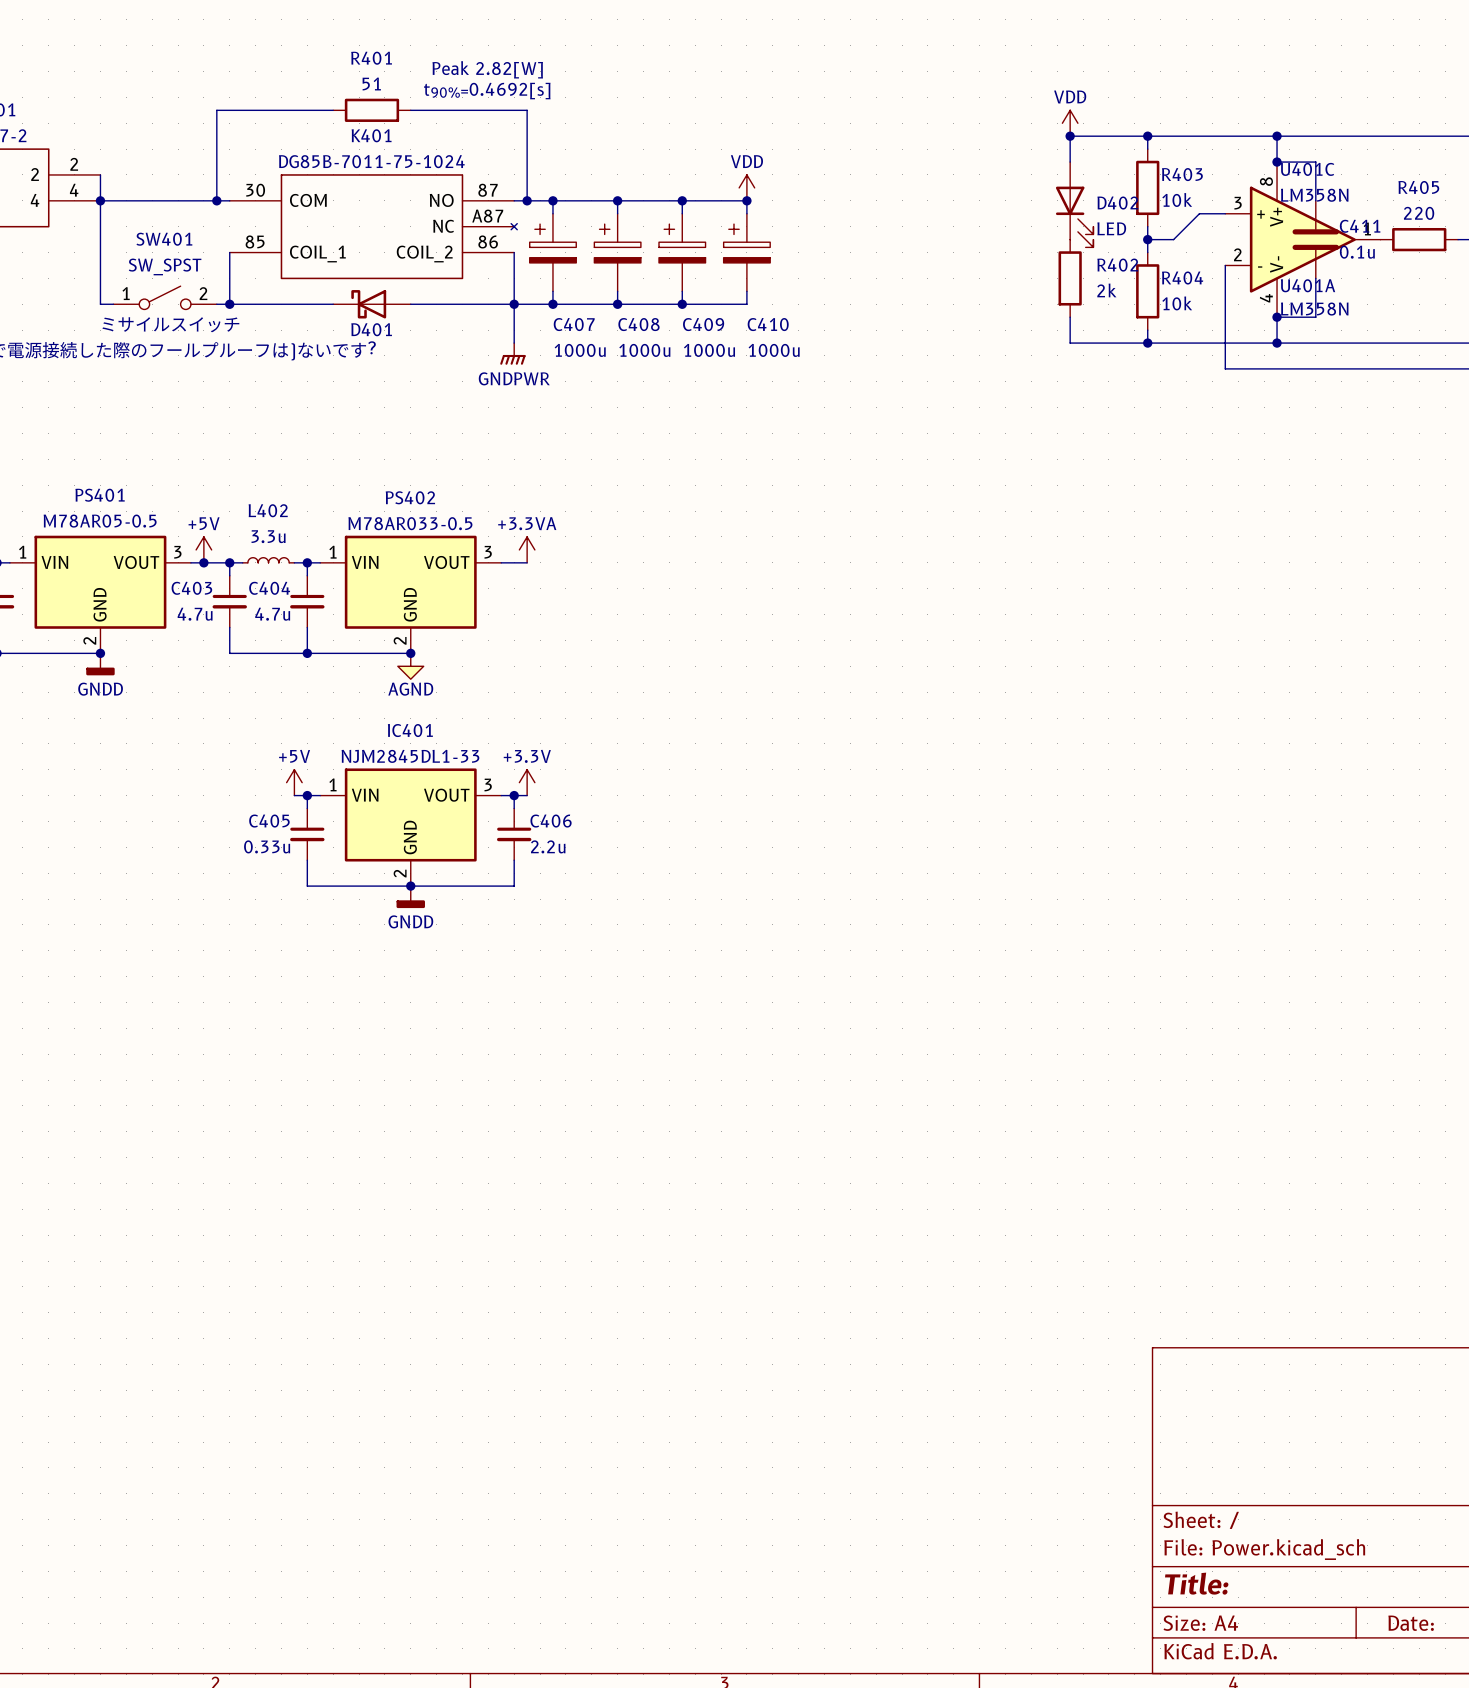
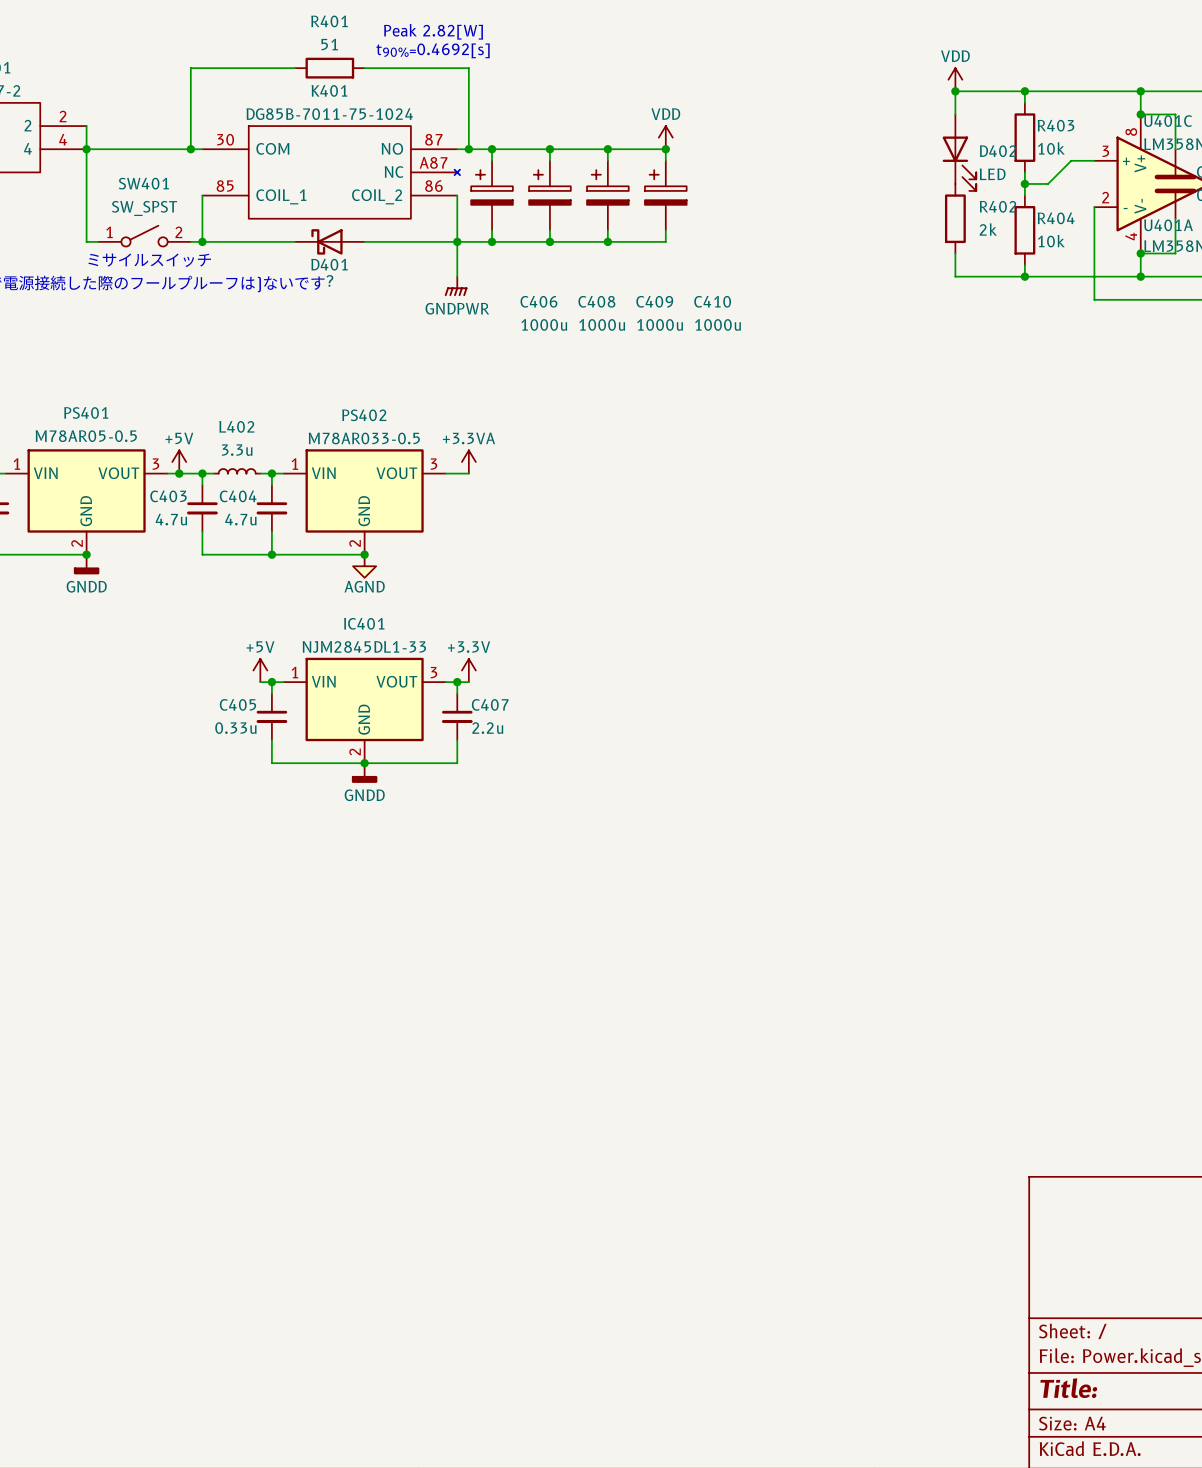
C407 name: C407 (574, 324) -> C406 (538, 301)
C408 name position: C408 (638, 324) -> C408 (596, 301)
C409 name position: C409 (703, 324) -> C409 (654, 301)
C410 name position: C410 (768, 324) -> C410 (712, 301)
C407 value position: 1000u (580, 350) -> 1000u (544, 324)
C408 value position: 1000u (644, 350) -> 1000u (602, 324)
C409 value position: 1000u (709, 350) -> 1000u (660, 324)
C410 value position: 1000u (774, 350) -> 1000u (717, 324)
C406 name: C406 (551, 821) -> C407 (490, 704)

